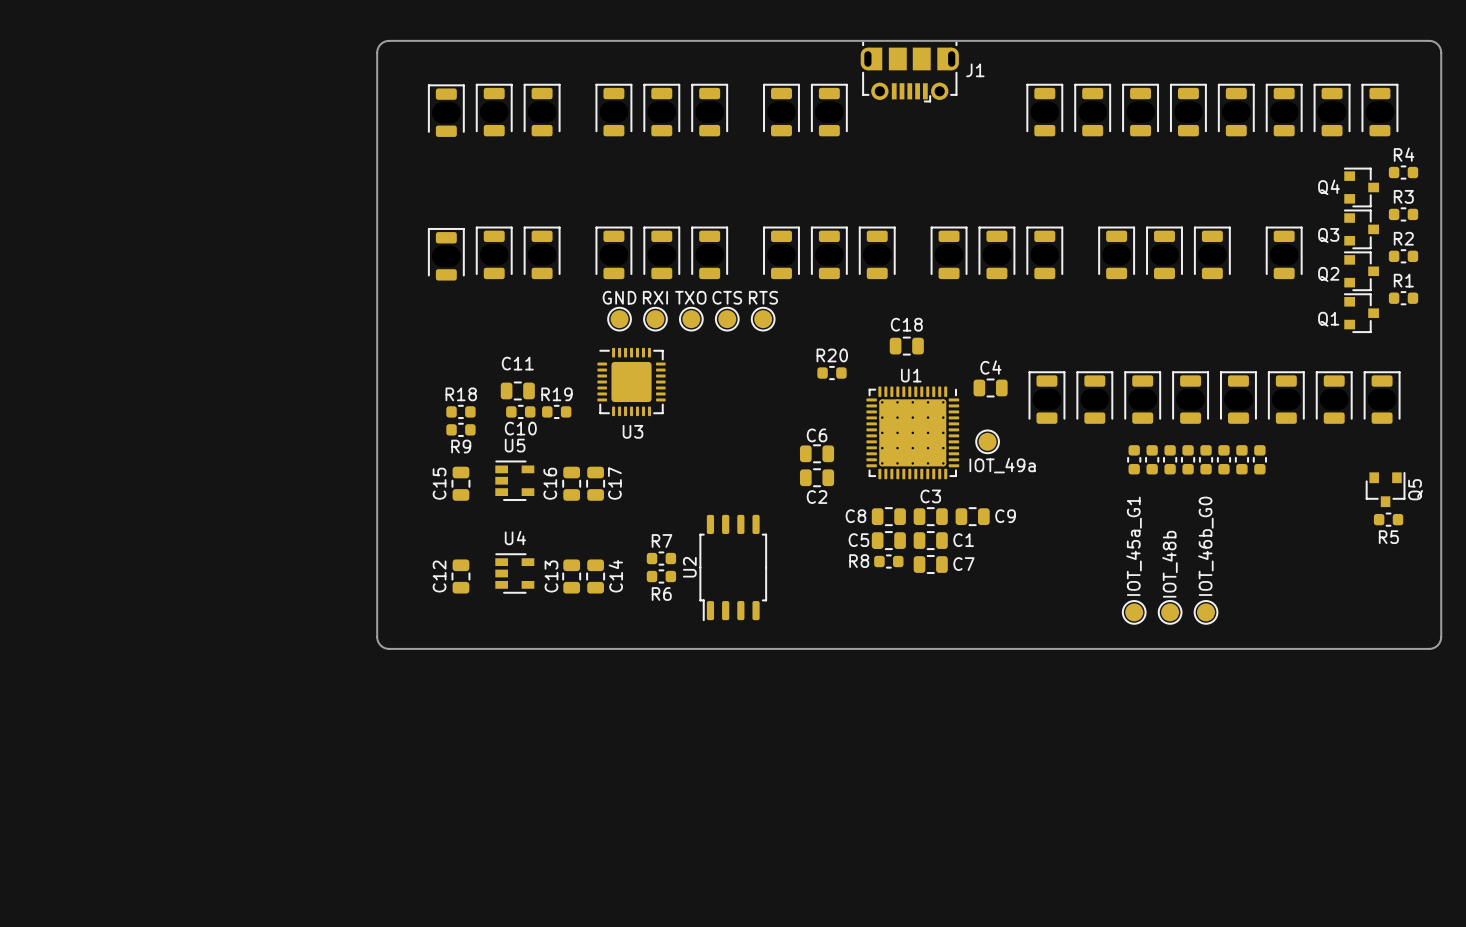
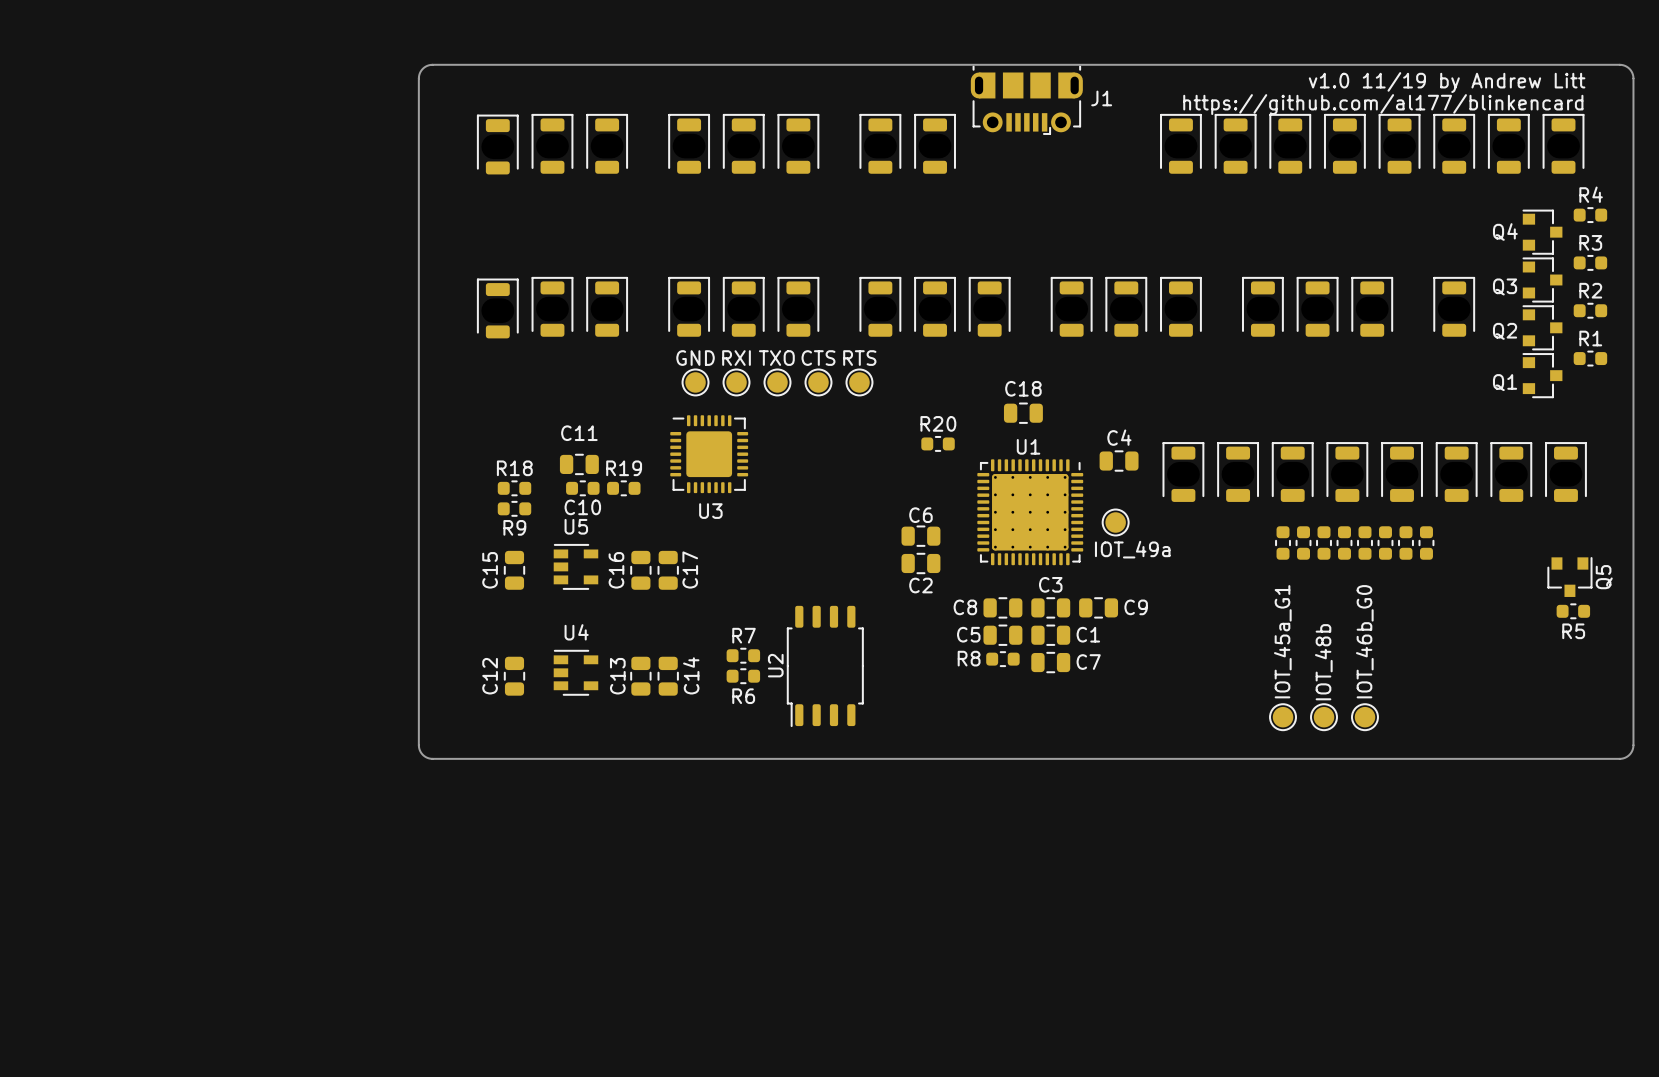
text: none -> v1.0 11/19 by Andrew Litt (1447, 82)
text: none -> https://github.com/al177/blinkencard (1383, 104)

